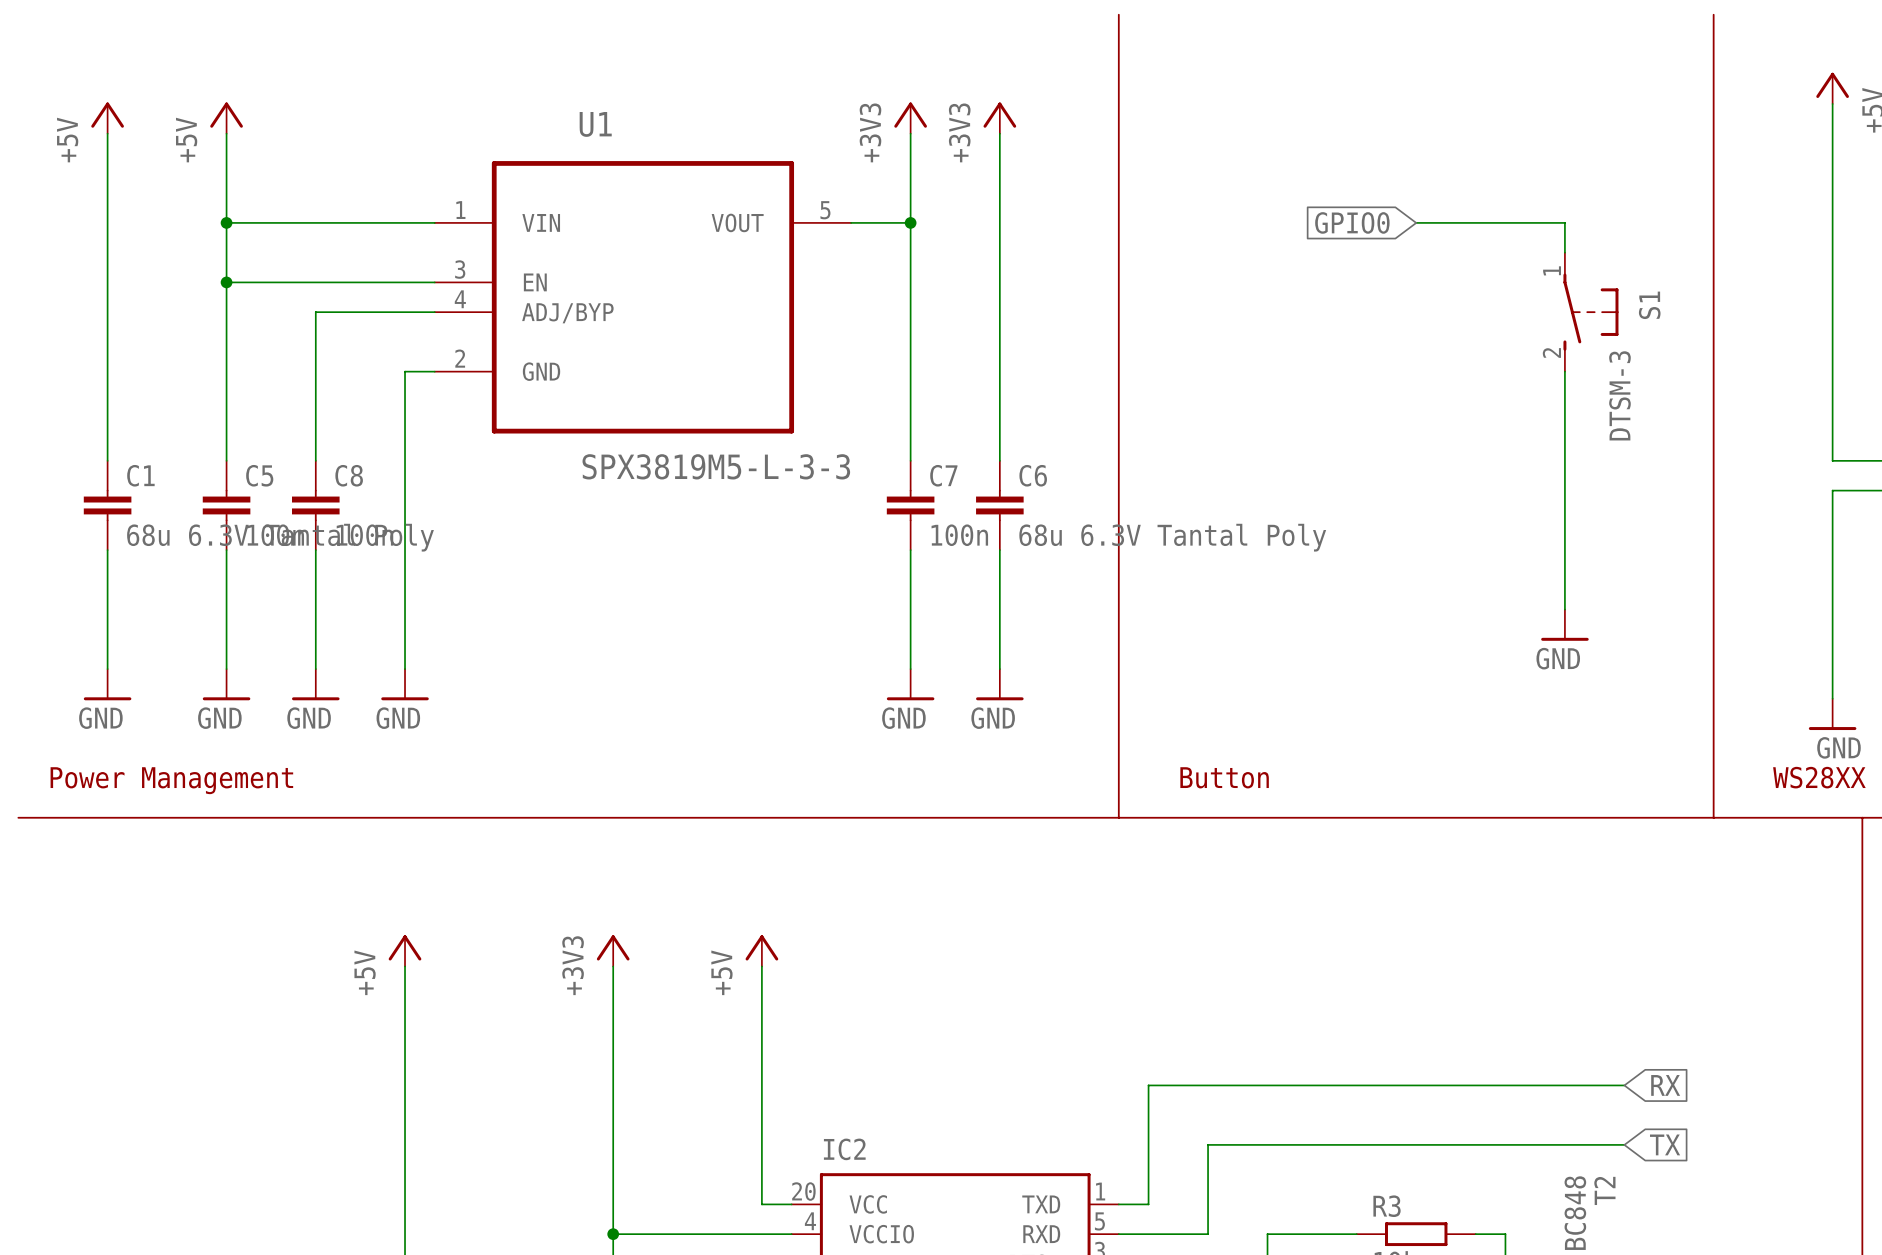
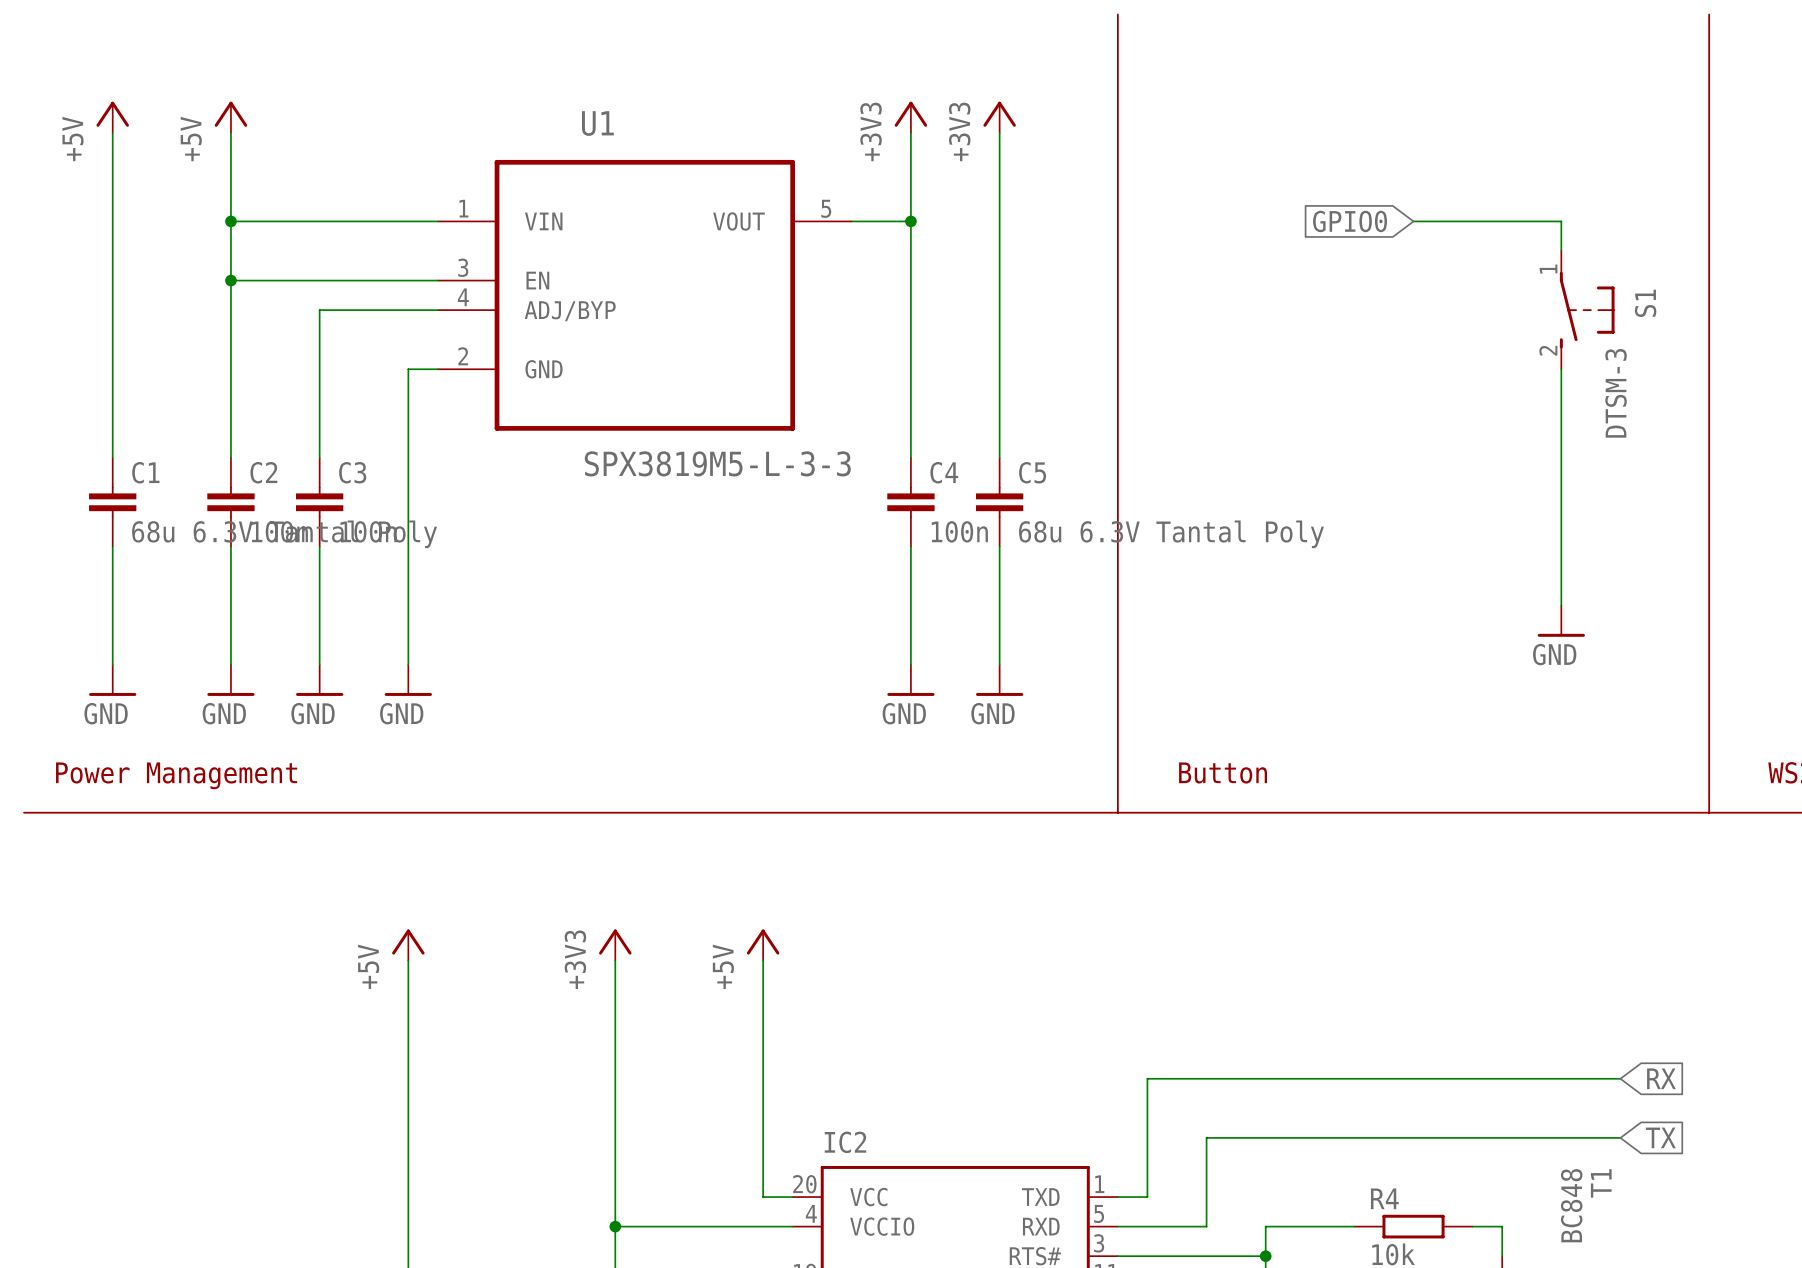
C5 name: C5 (259, 475) -> C2 (263, 472)
C8 name: C8 (349, 475) -> C3 (352, 472)
C7 name: C7 (943, 475) -> C4 (944, 472)
C6 name: C6 (1033, 475) -> C5 (1032, 472)
T2 name: T2 (1604, 1190) -> T1 (1601, 1183)
R3 name: R3 (1387, 1206) -> R4 (1384, 1198)

